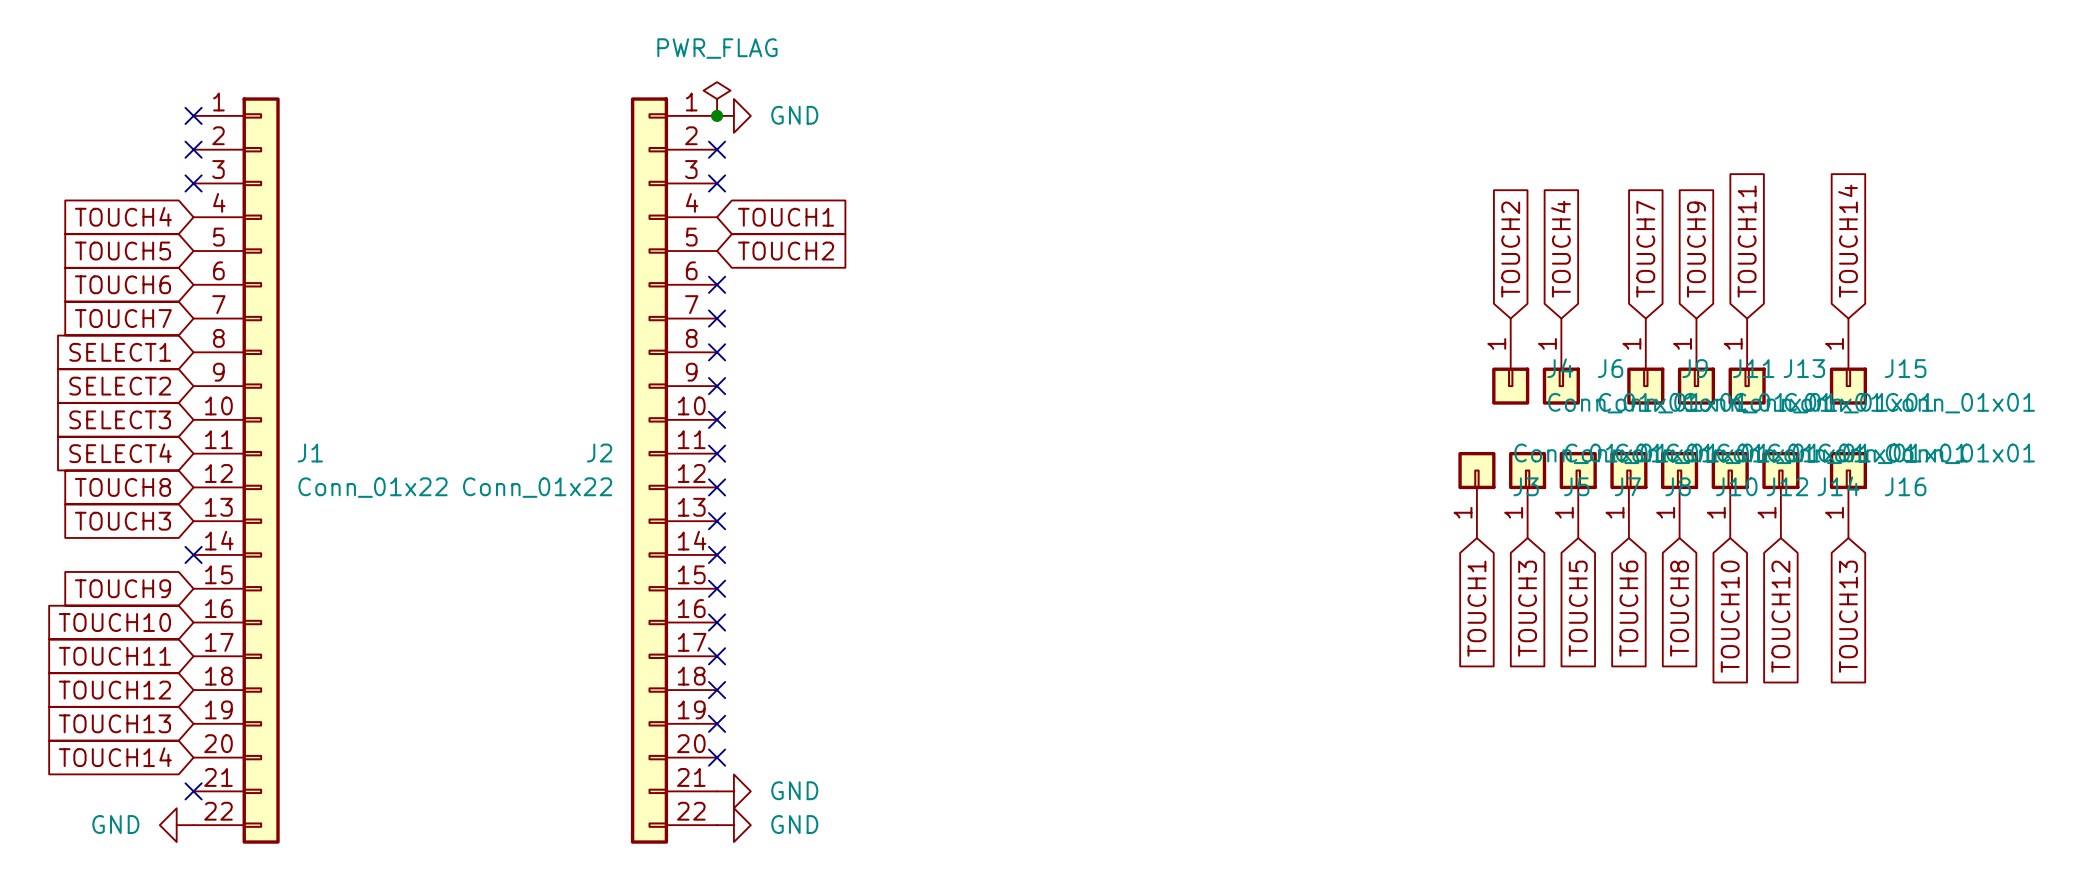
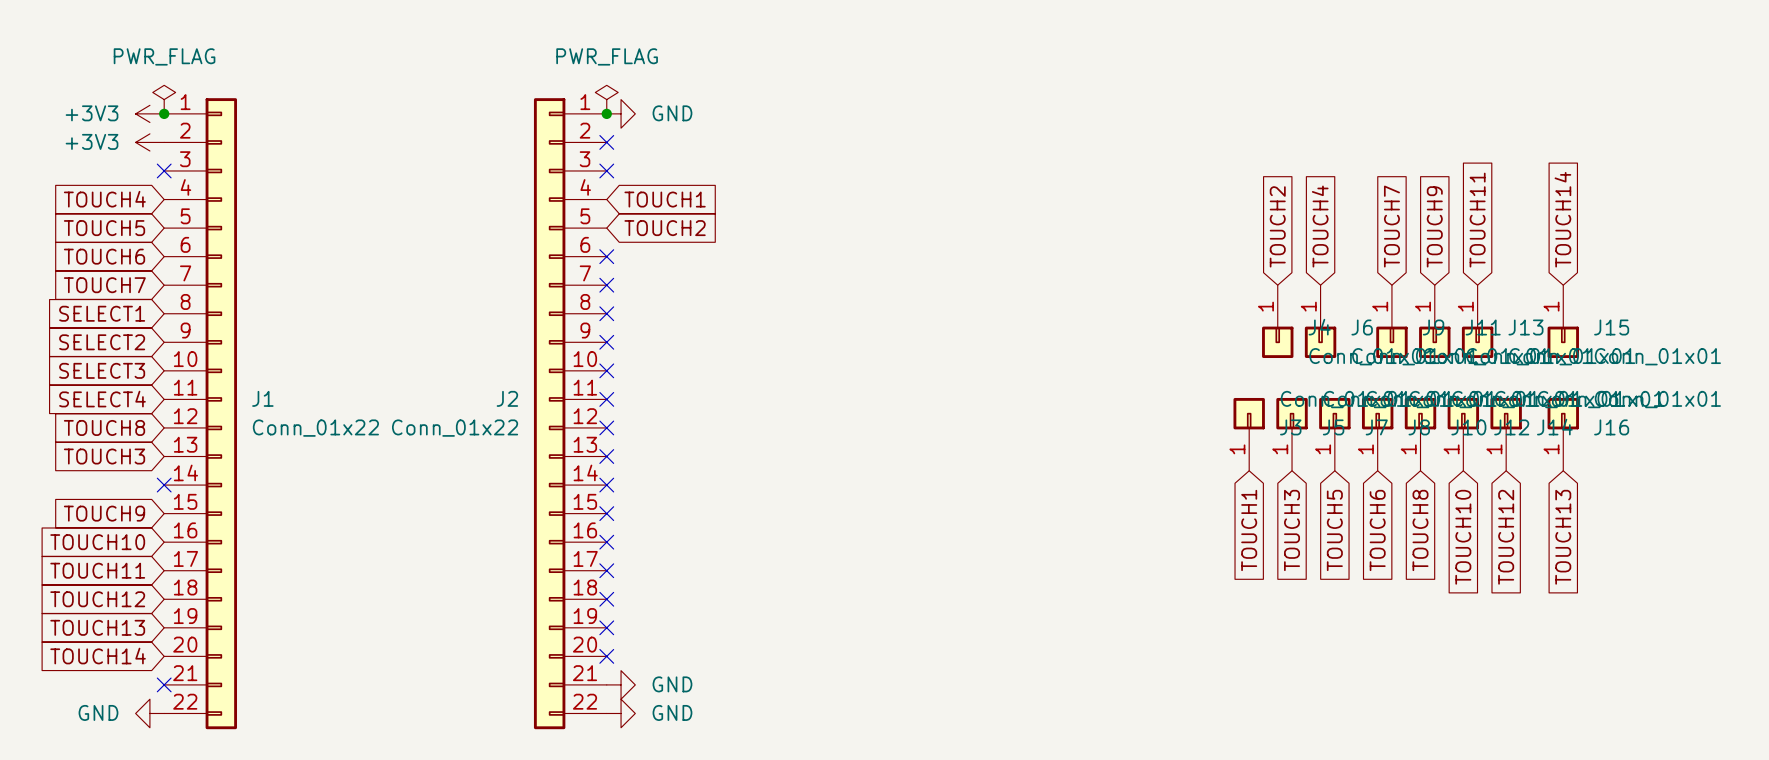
power symbol: none -> PWR_FLAG (164, 99)
power symbol: none -> +3V3 (149, 113)
no-connect mark: (193, 115) -> none
junction: none -> (164, 113)
power symbol: none -> +3V3 (149, 142)
no-connect mark: (193, 149) -> none

